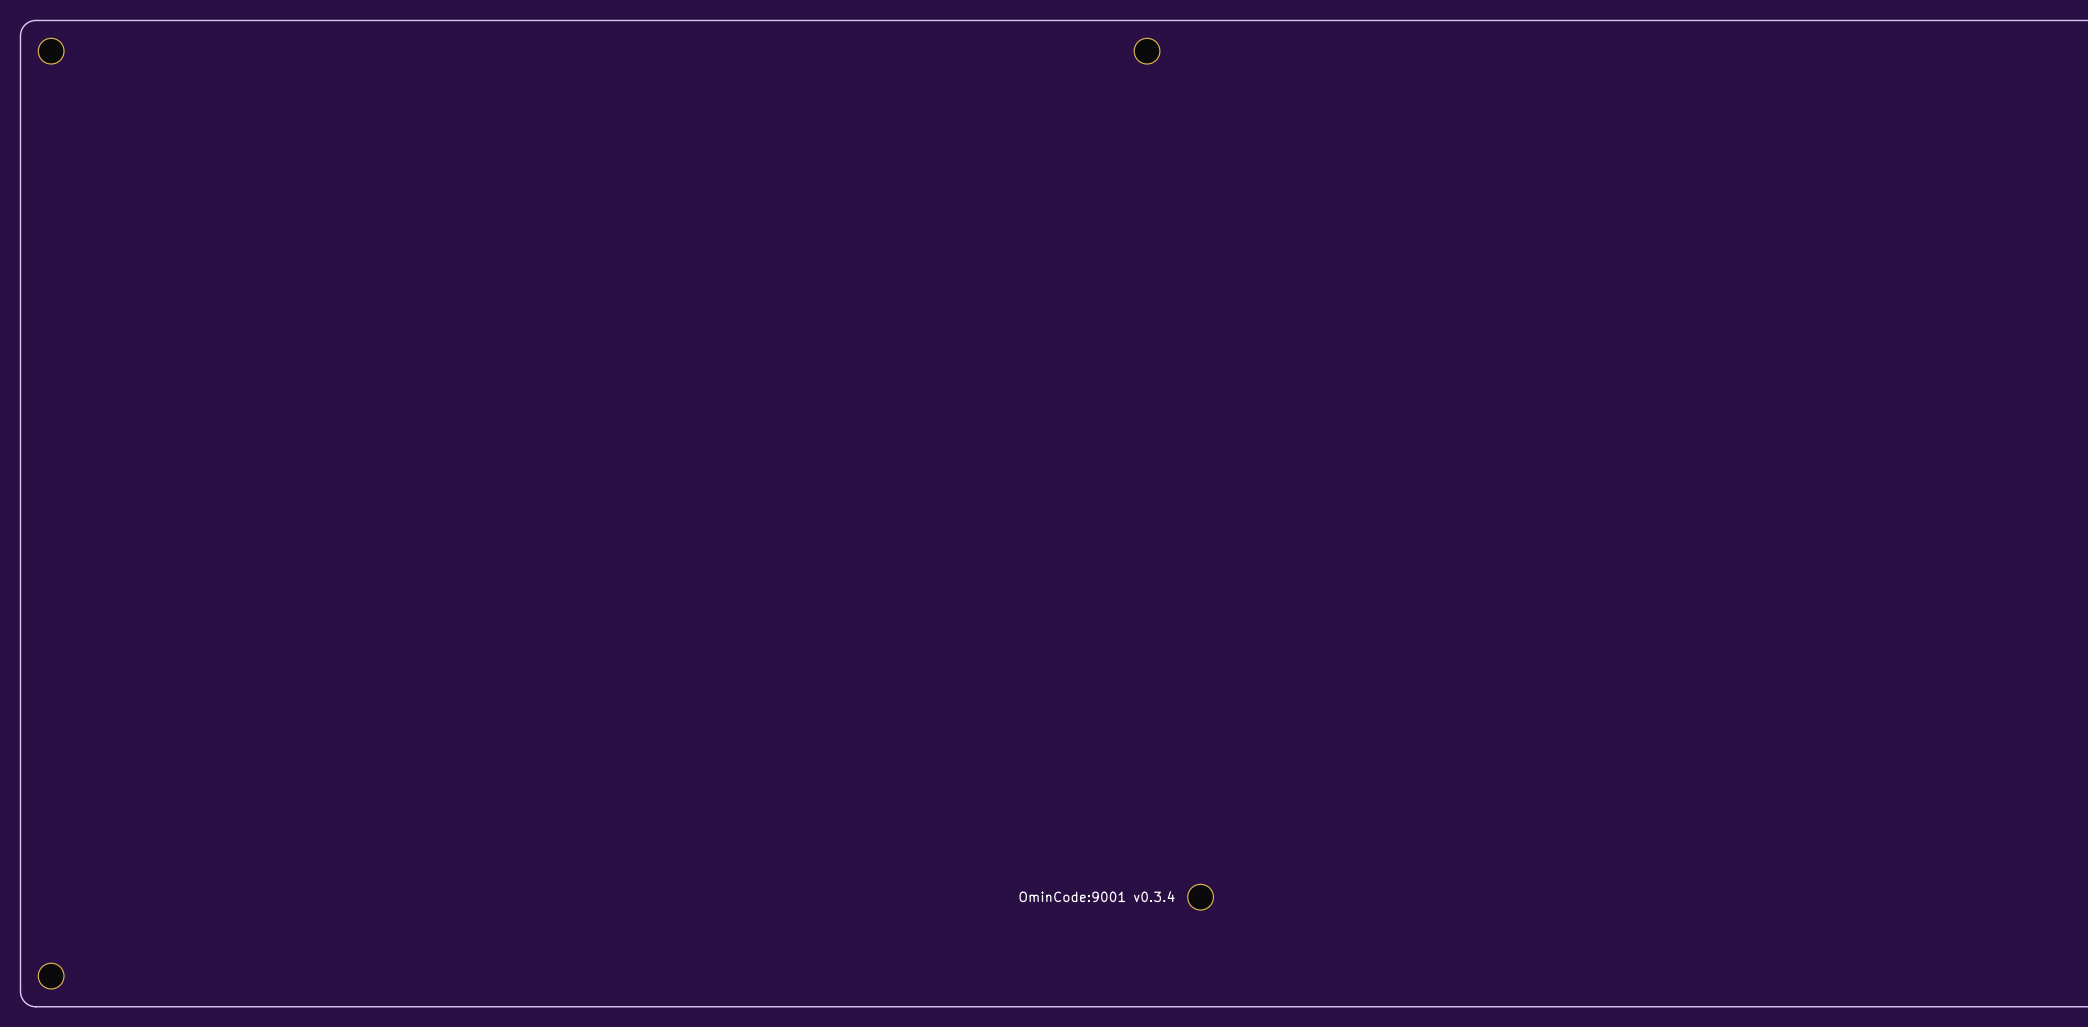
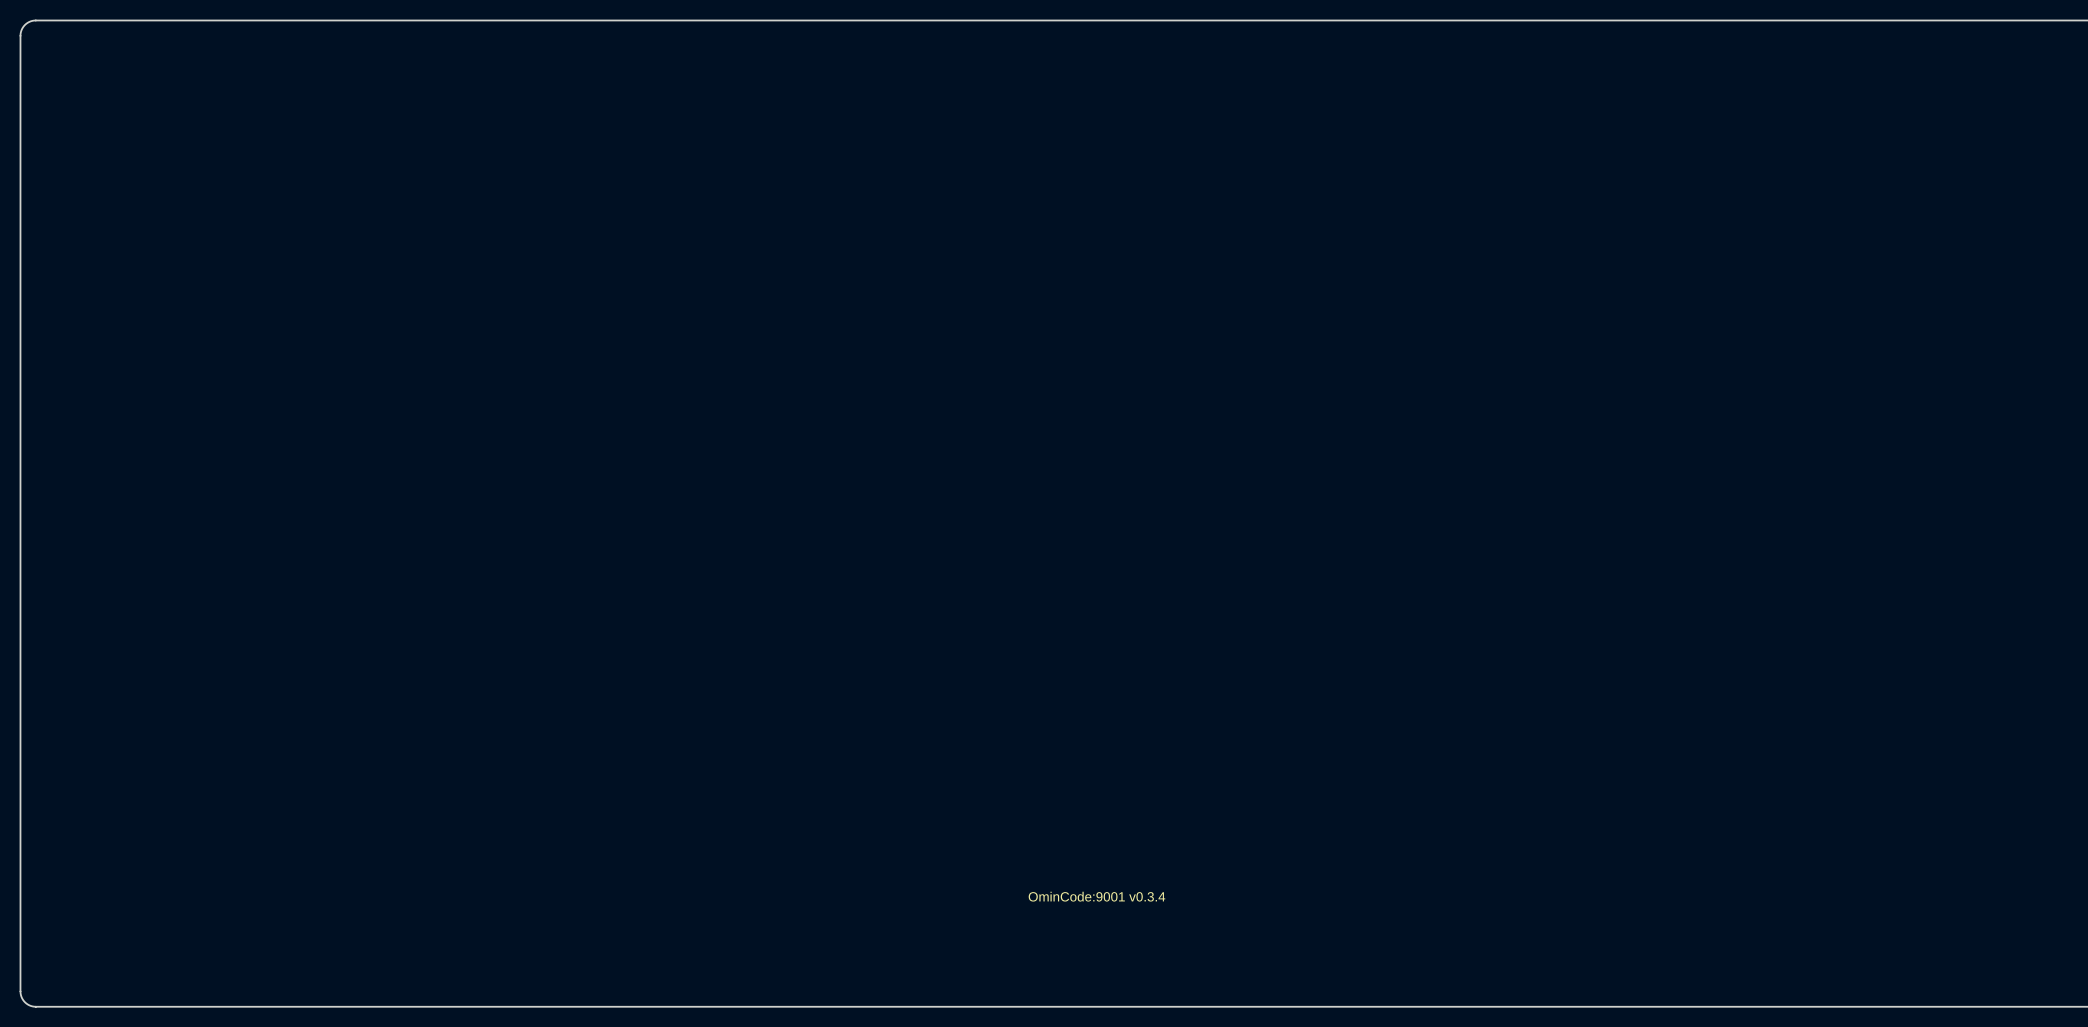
part: (51, 51) -> none
part: (1147, 51) -> none
part: (1200, 897) -> none
part: (51, 976) -> none

